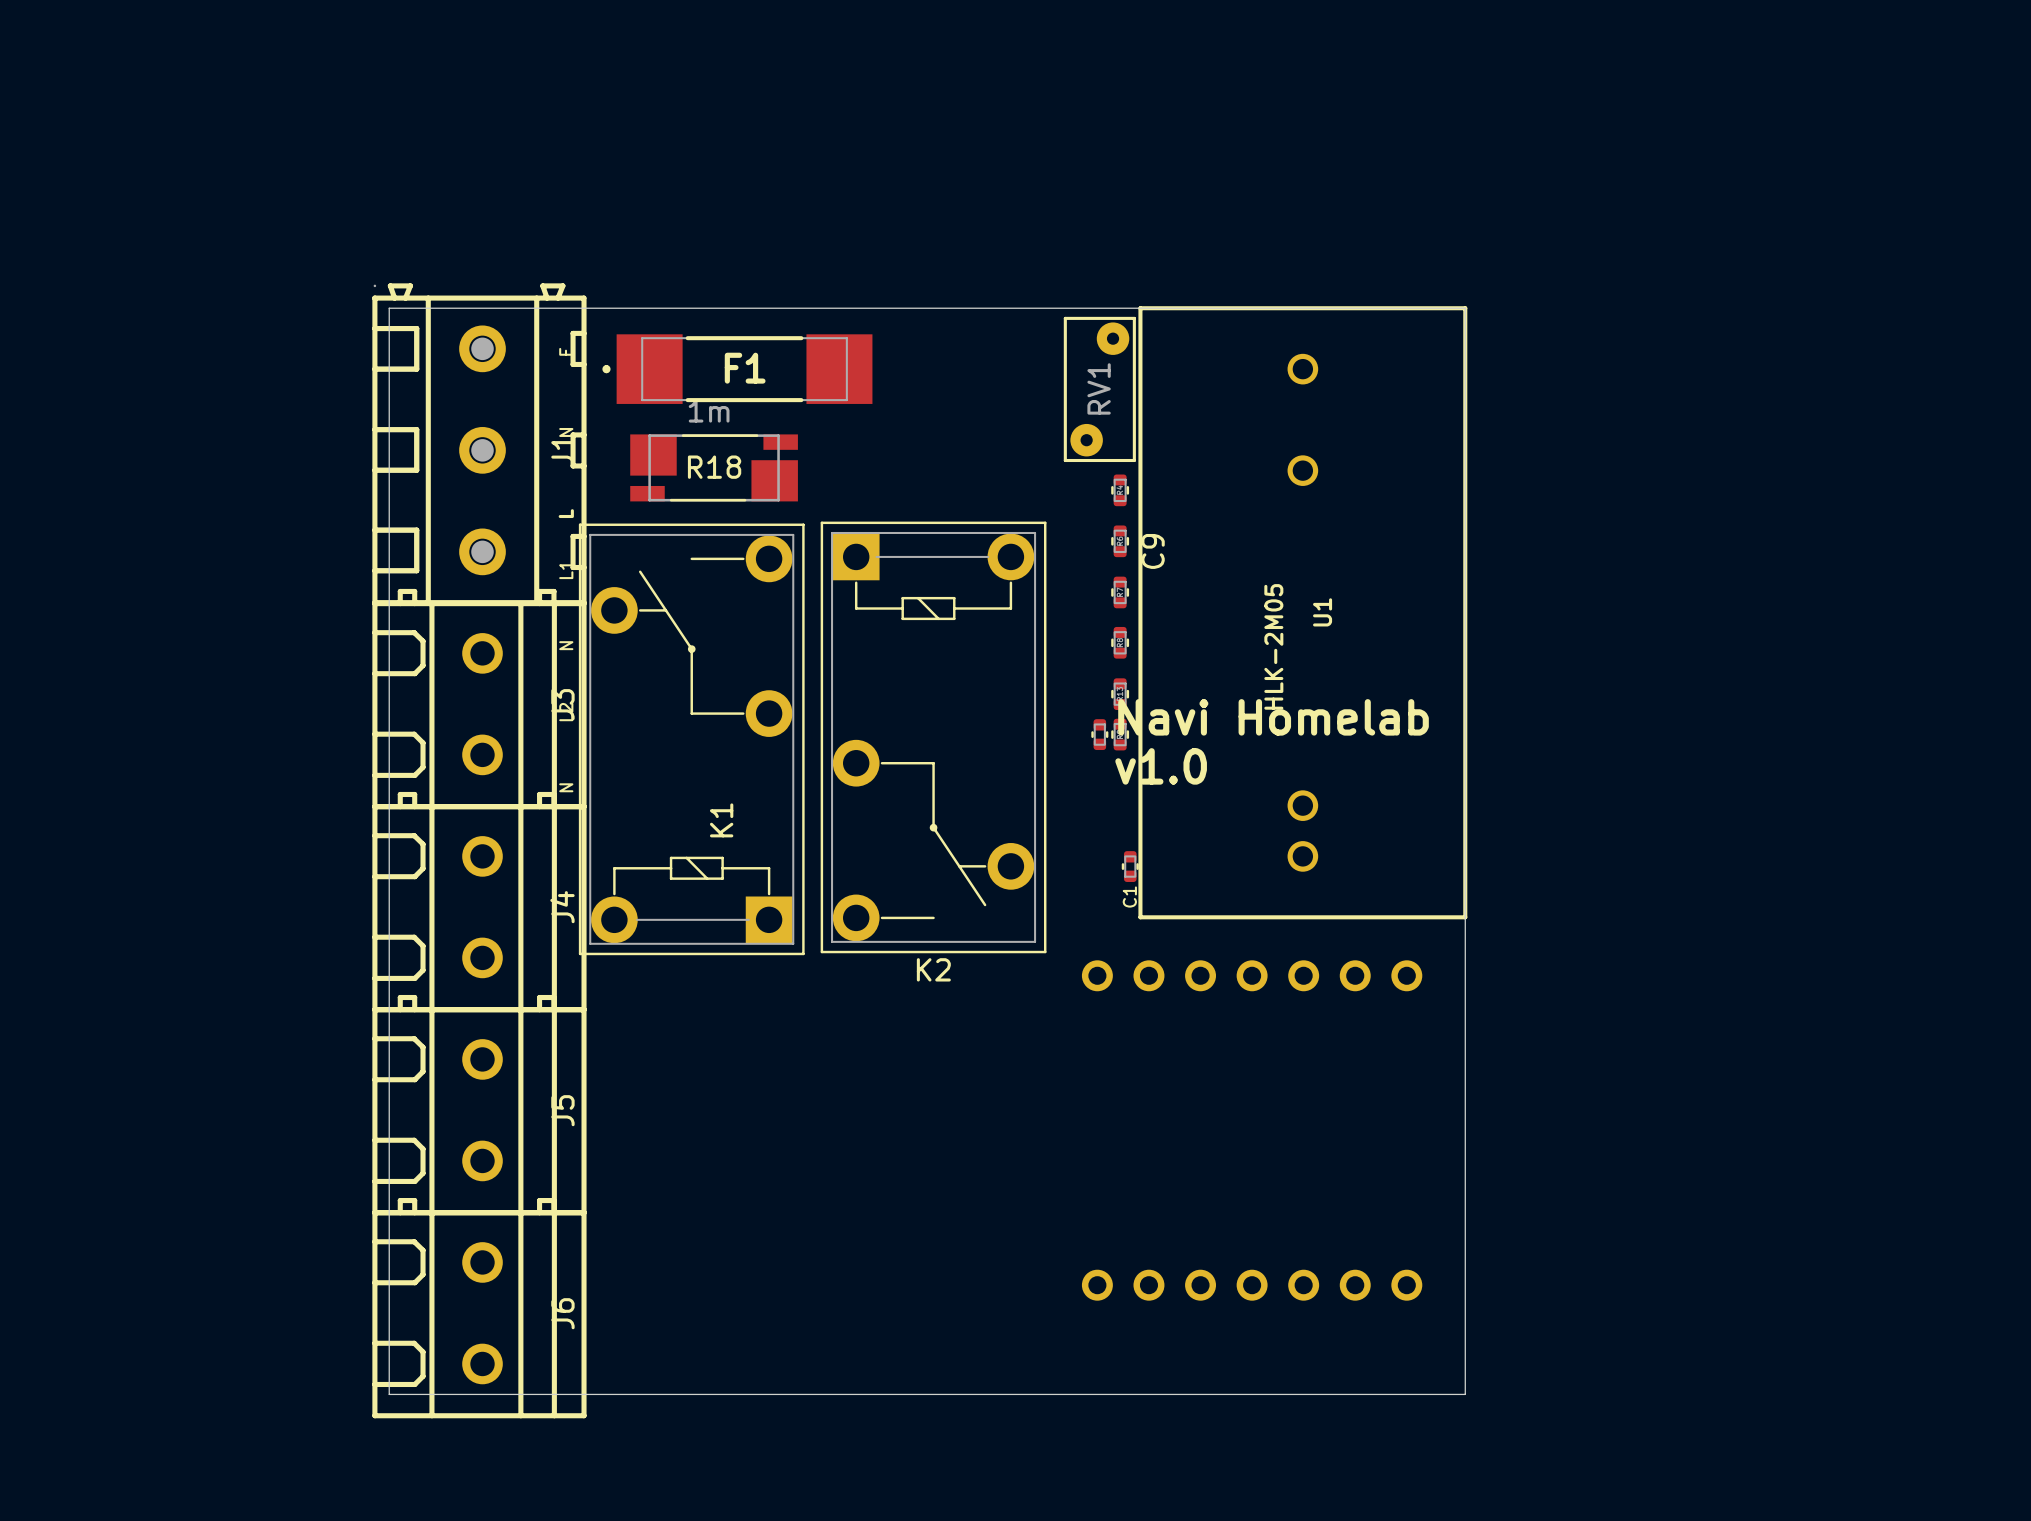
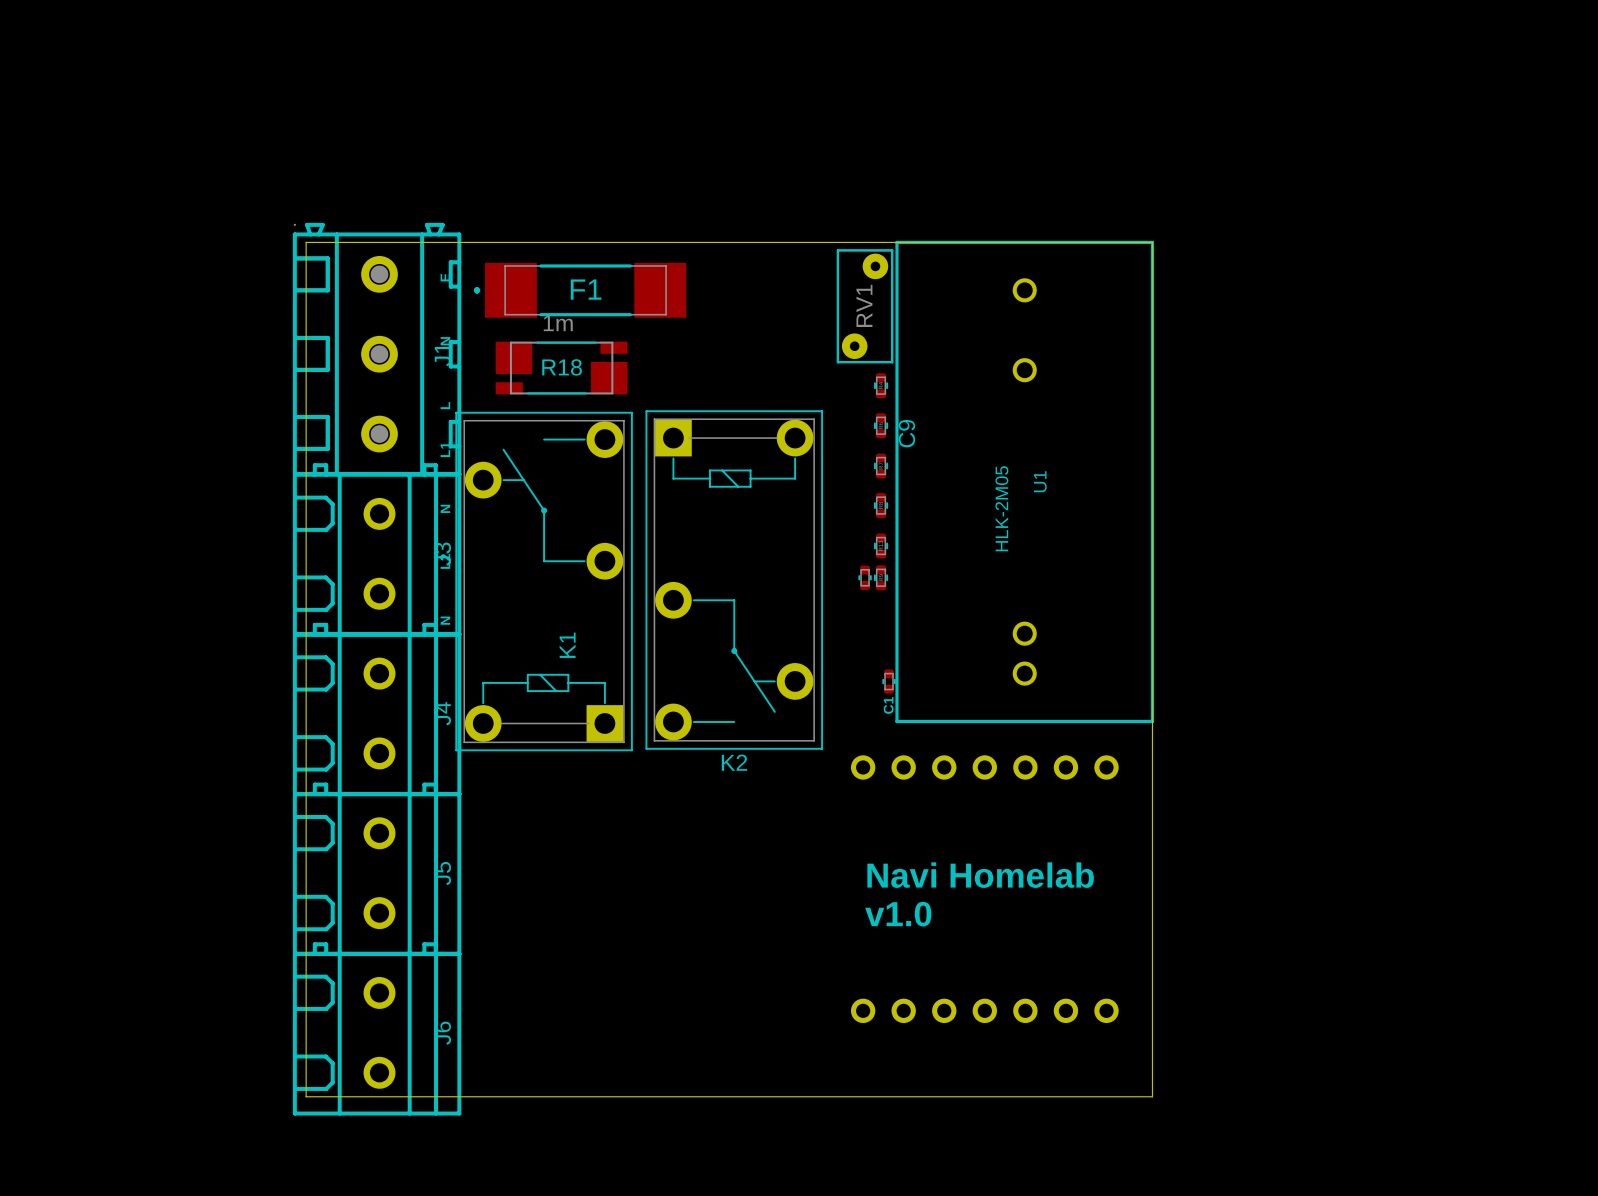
text position: Navi Homelab (1273, 717) -> Navi Homelab (980, 875)
text position: v1.0 (1161, 766) -> v1.0 (898, 914)

